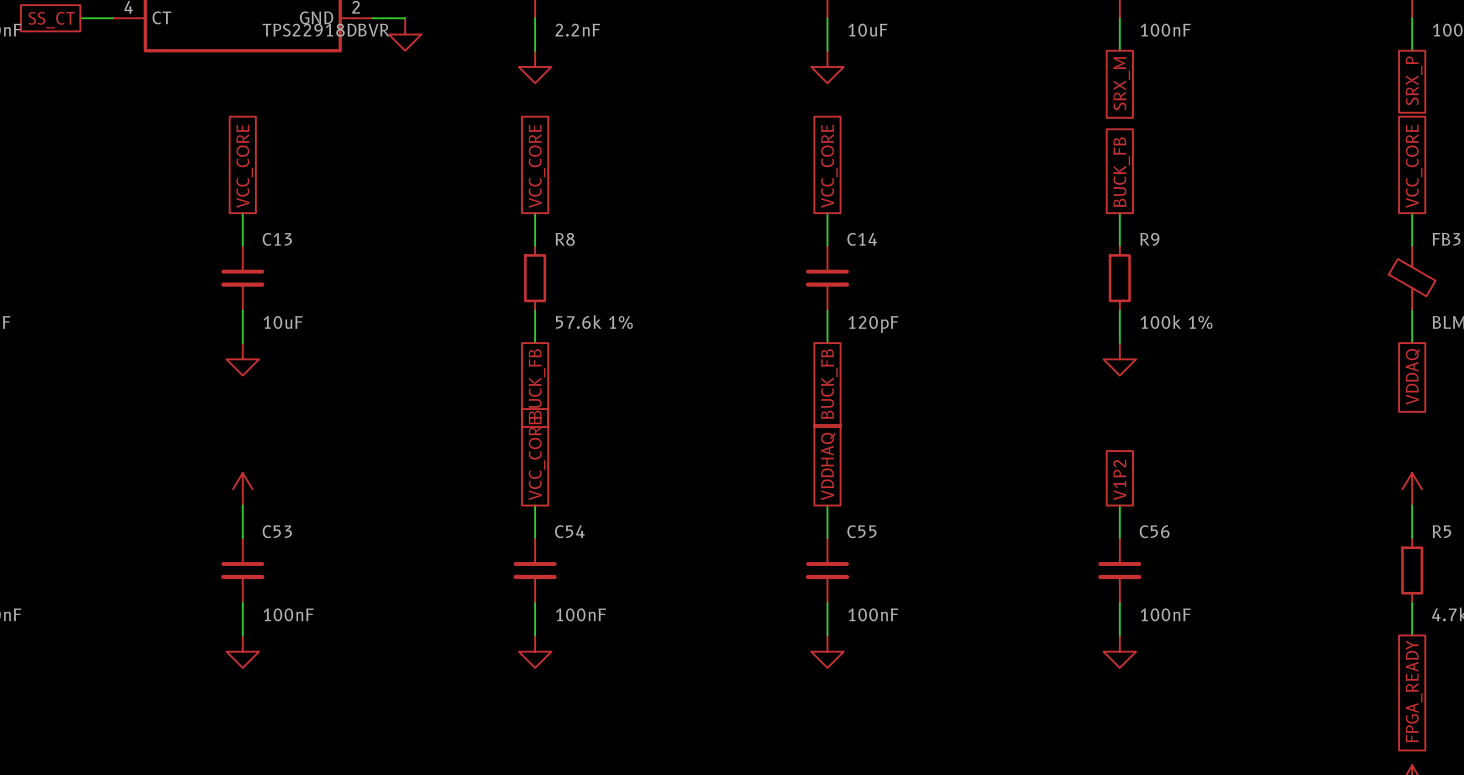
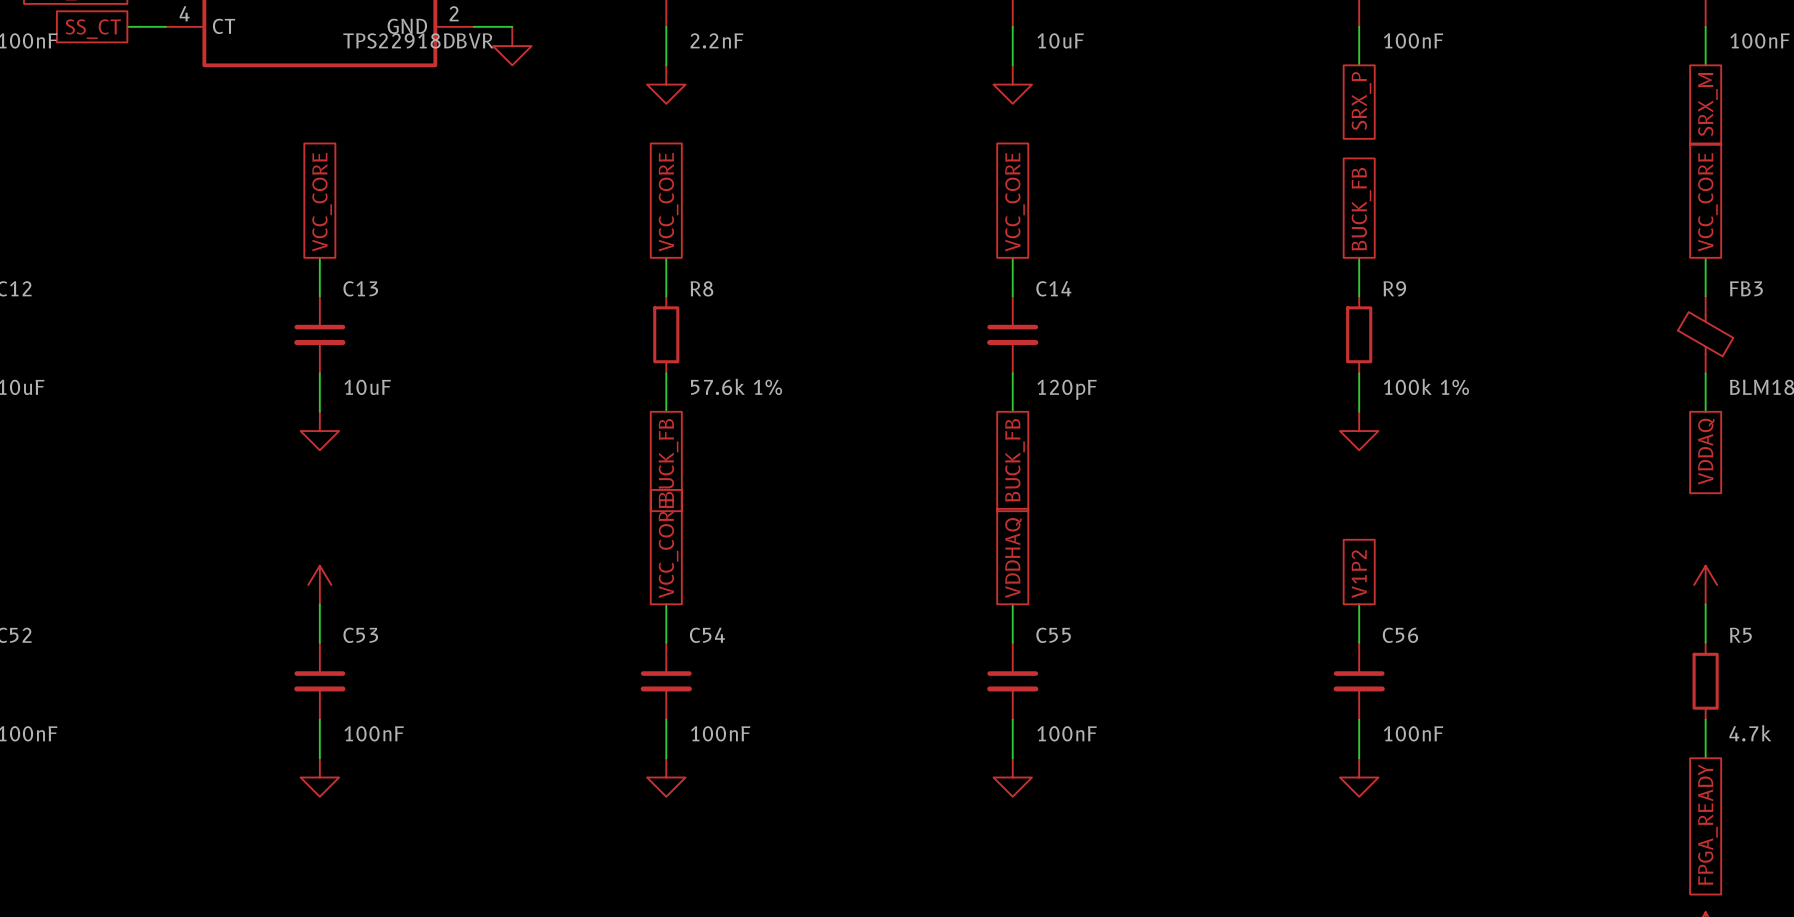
global label: SRX_P (1414, 80) -> SRX_M (1707, 104)
global label: SRX_M (1121, 83) -> SRX_P (1361, 101)

